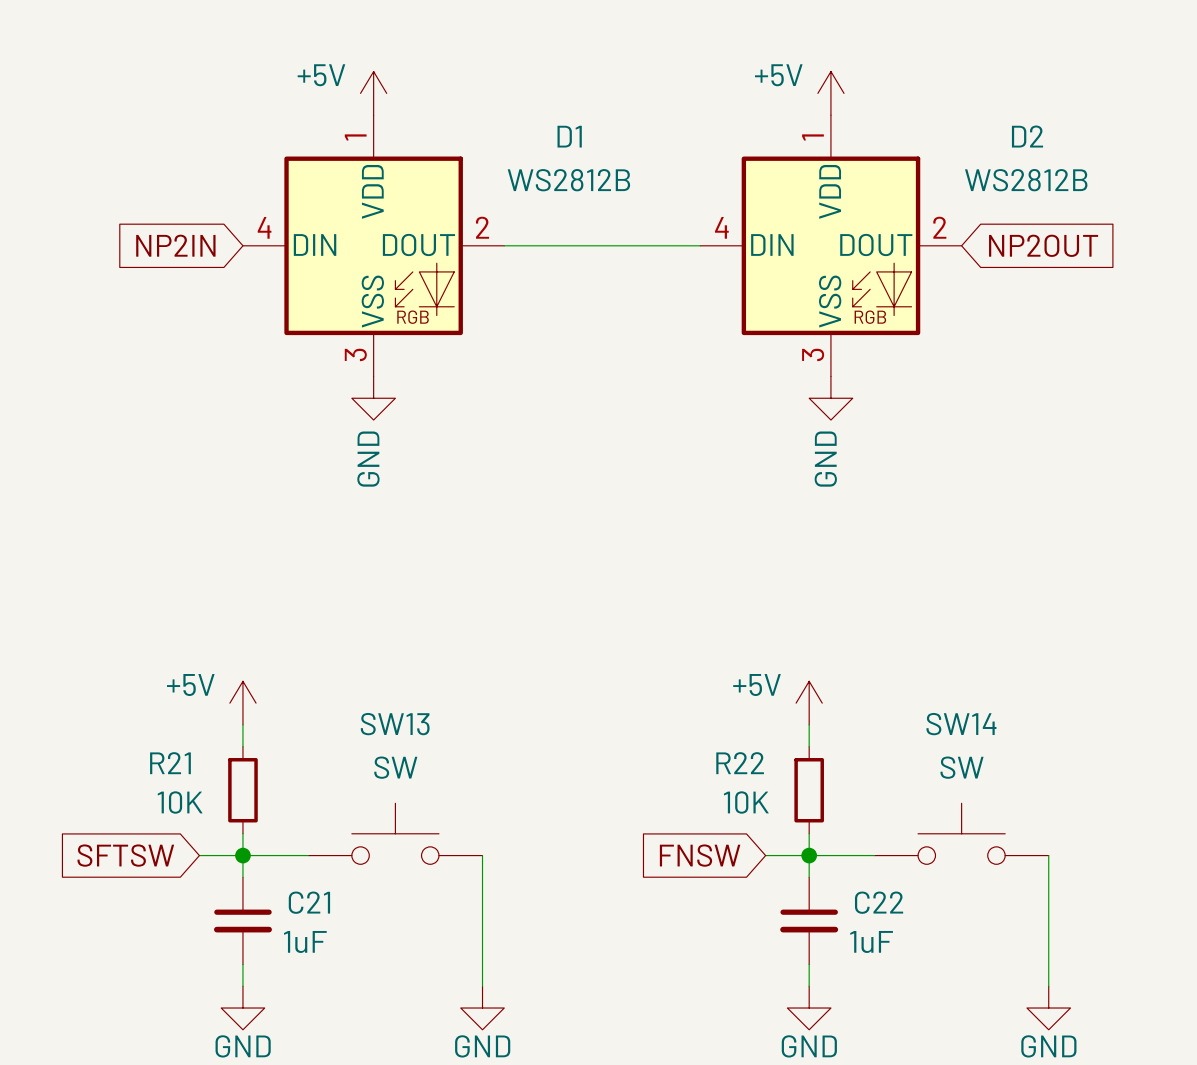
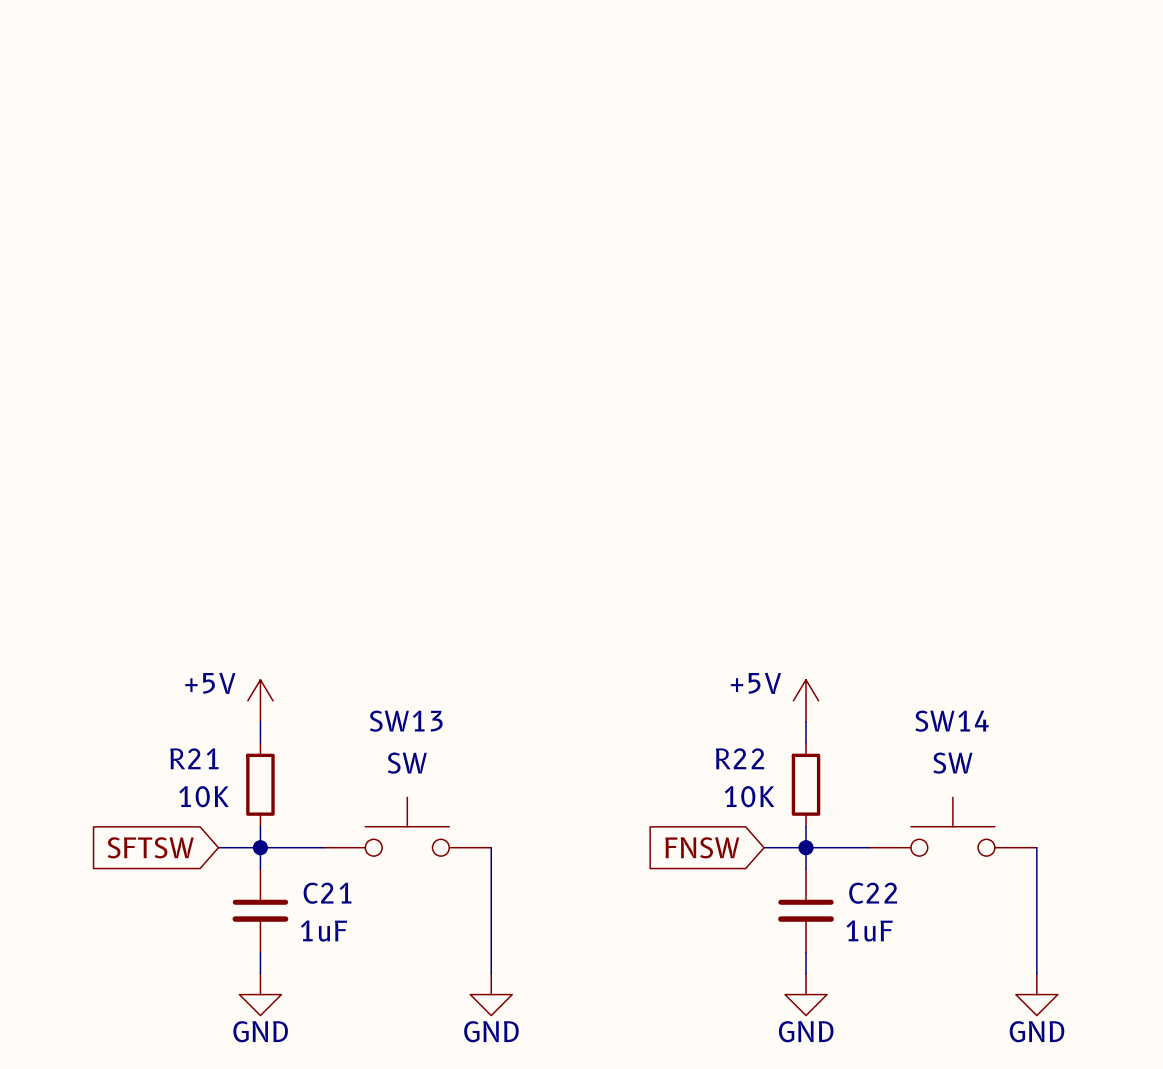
power symbol: +5V (373, 93) -> none
power symbol: +5V (830, 93) -> none
global label: NP2IN (175, 245) -> none
D1: WS2812B (373, 245) -> none
wire: (504, 245) (700, 245) -> none
D2: WS2812B (830, 245) -> none
global label: NP2OUT (1043, 245) -> none
power symbol: GND (373, 398) -> none
power symbol: GND (830, 398) -> none

